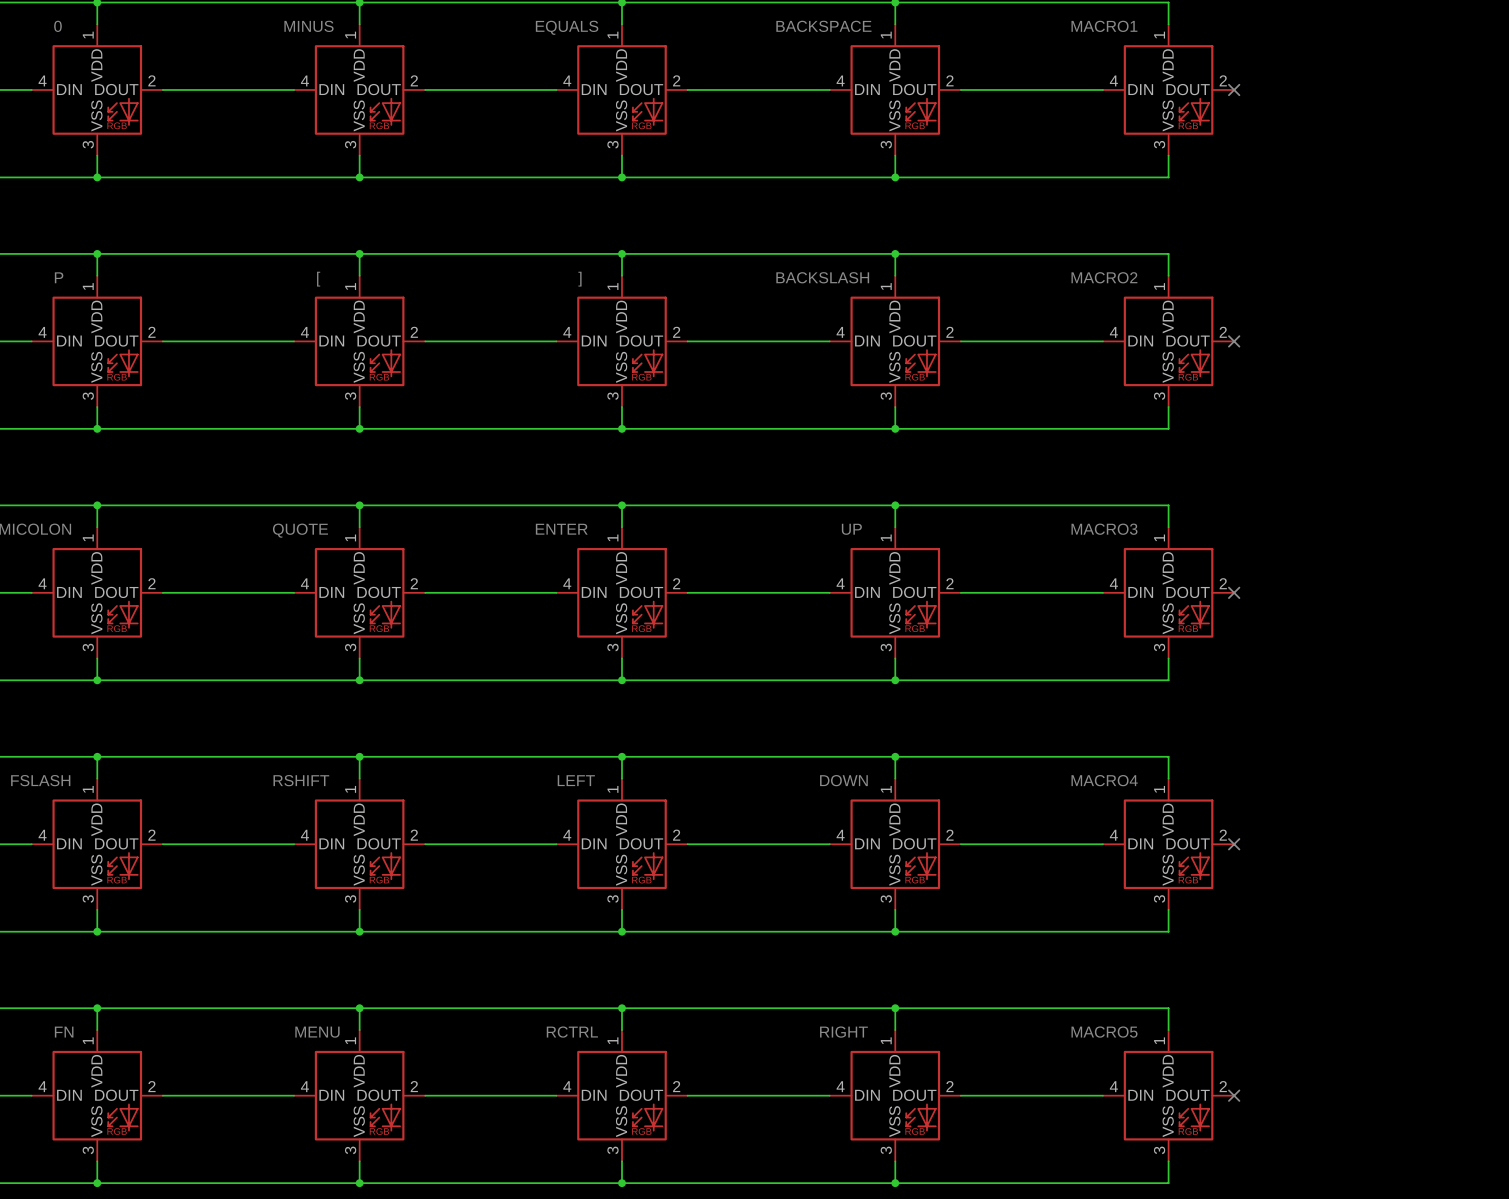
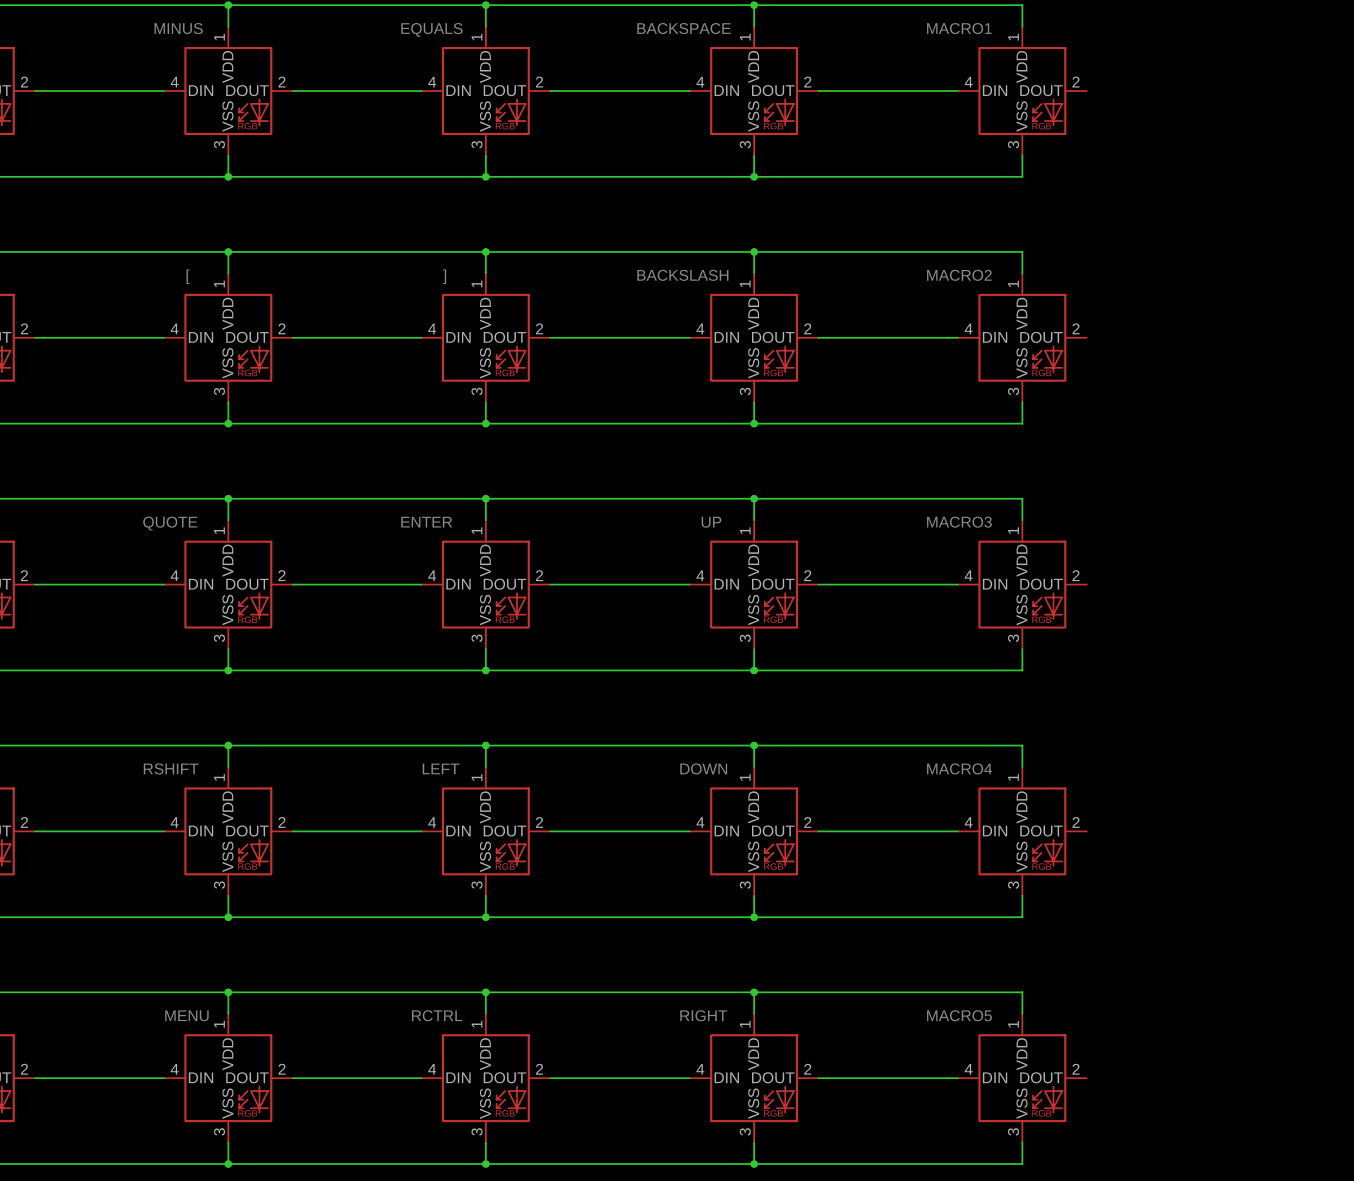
no-connect mark: (1234, 89) -> none
no-connect mark: (1234, 341) -> none
no-connect mark: (1234, 592) -> none
no-connect mark: (1234, 844) -> none
no-connect mark: (1234, 1095) -> none

